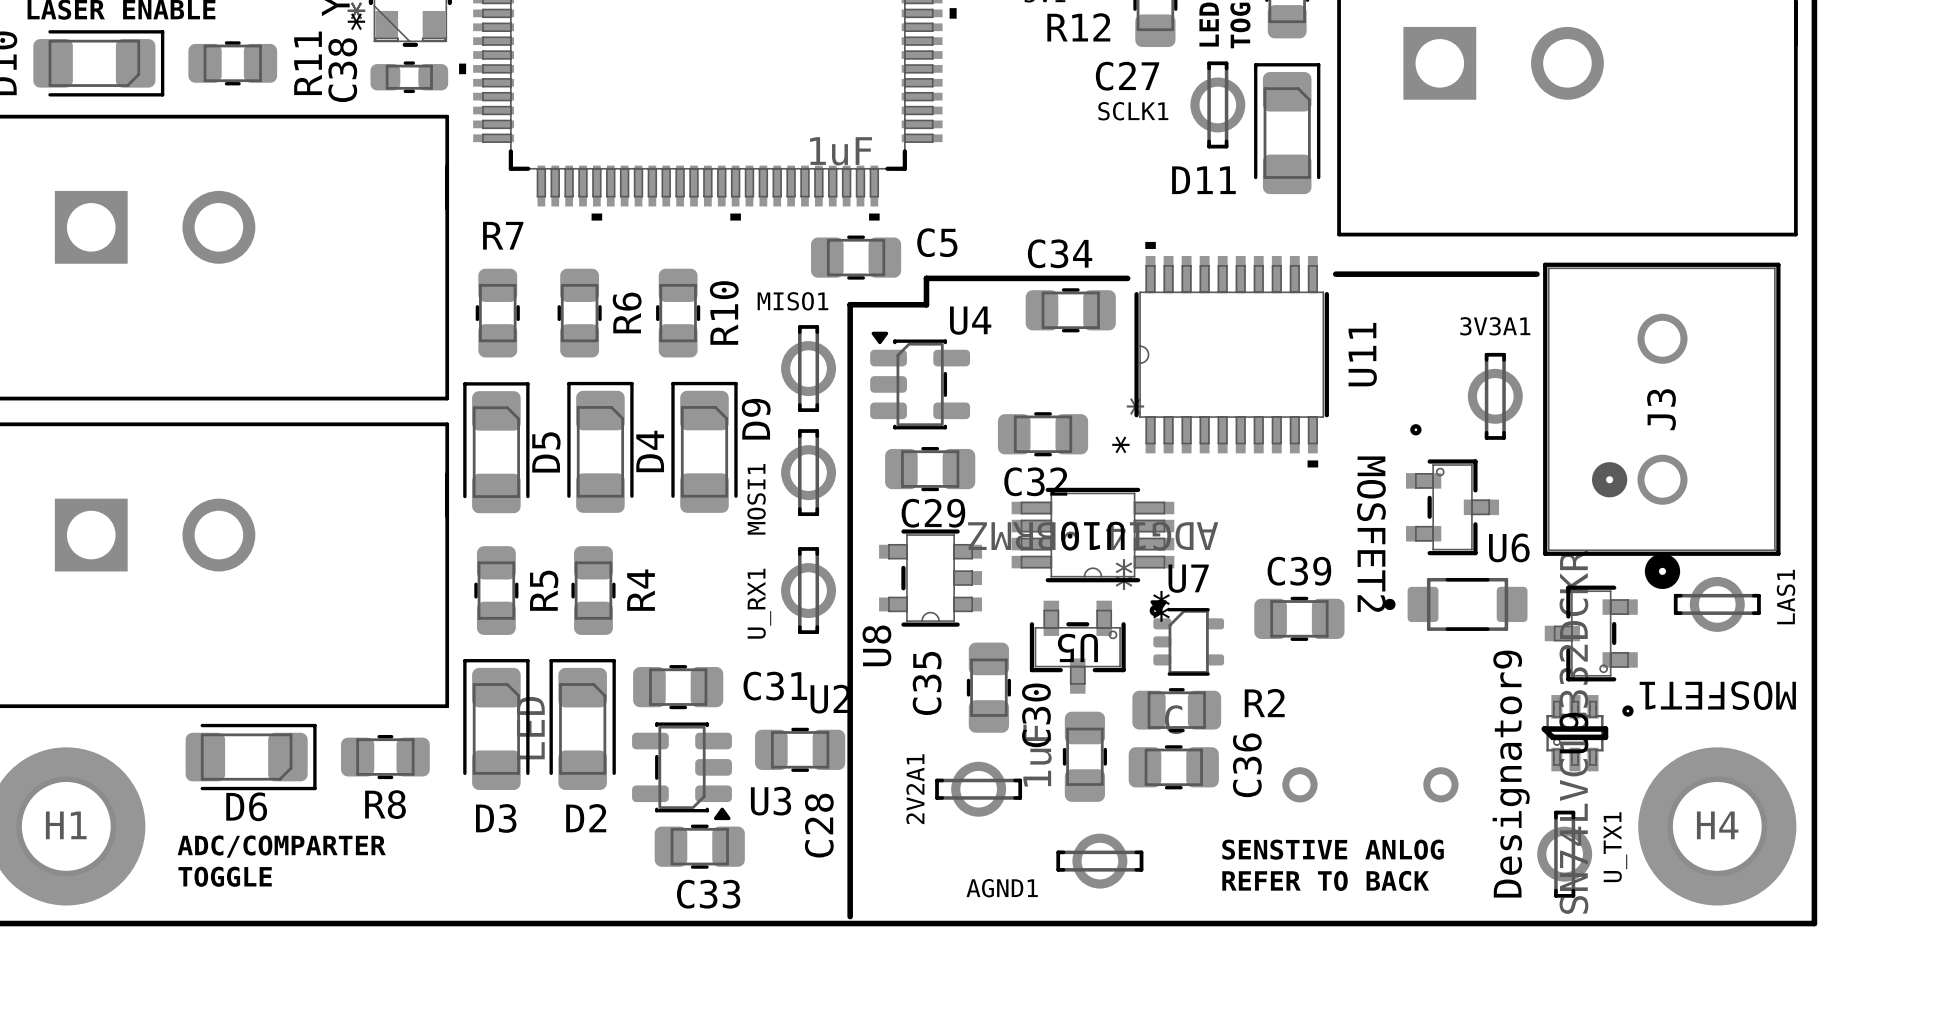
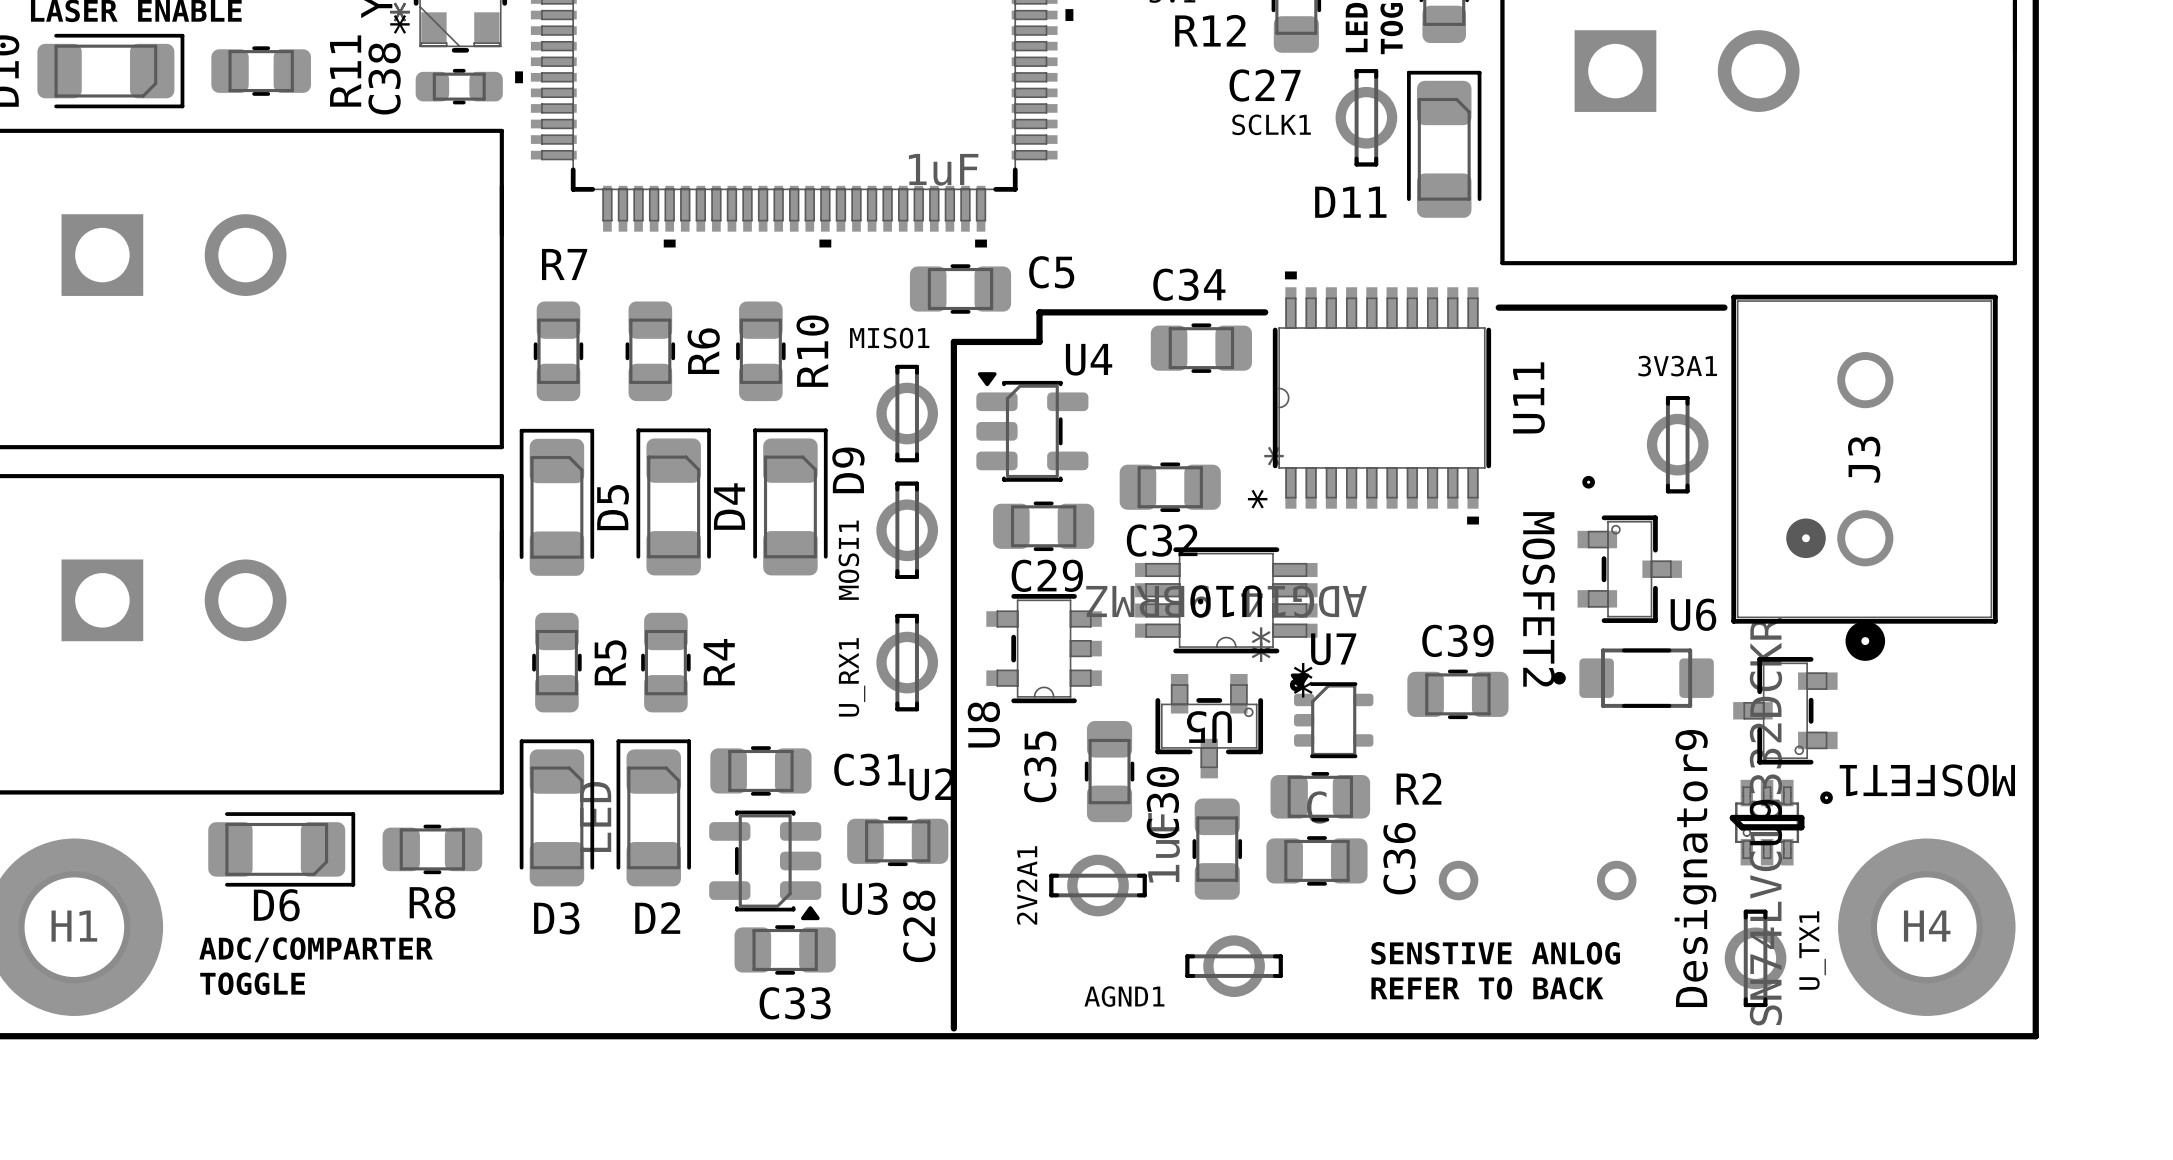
LAS1: (1717, 604) -> none

